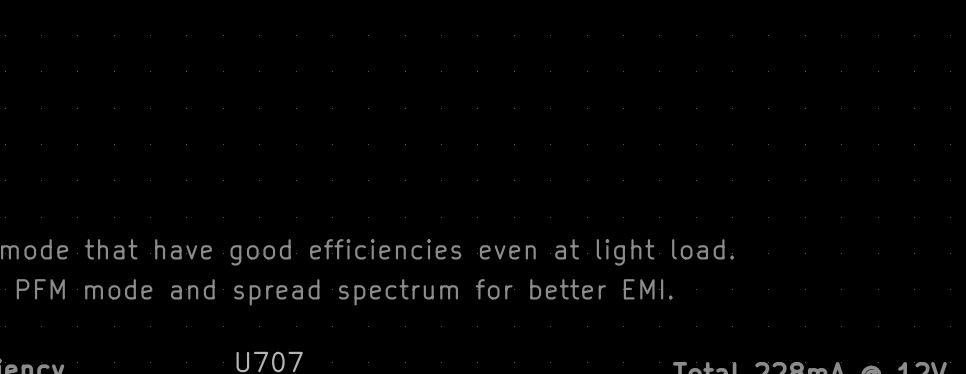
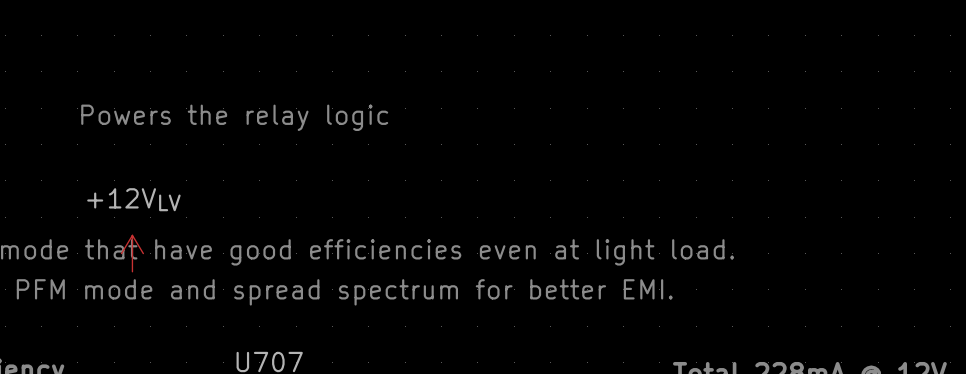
text: none -> Powers the relay logic (234, 117)
power symbol: none -> +12VLV (132, 253)

